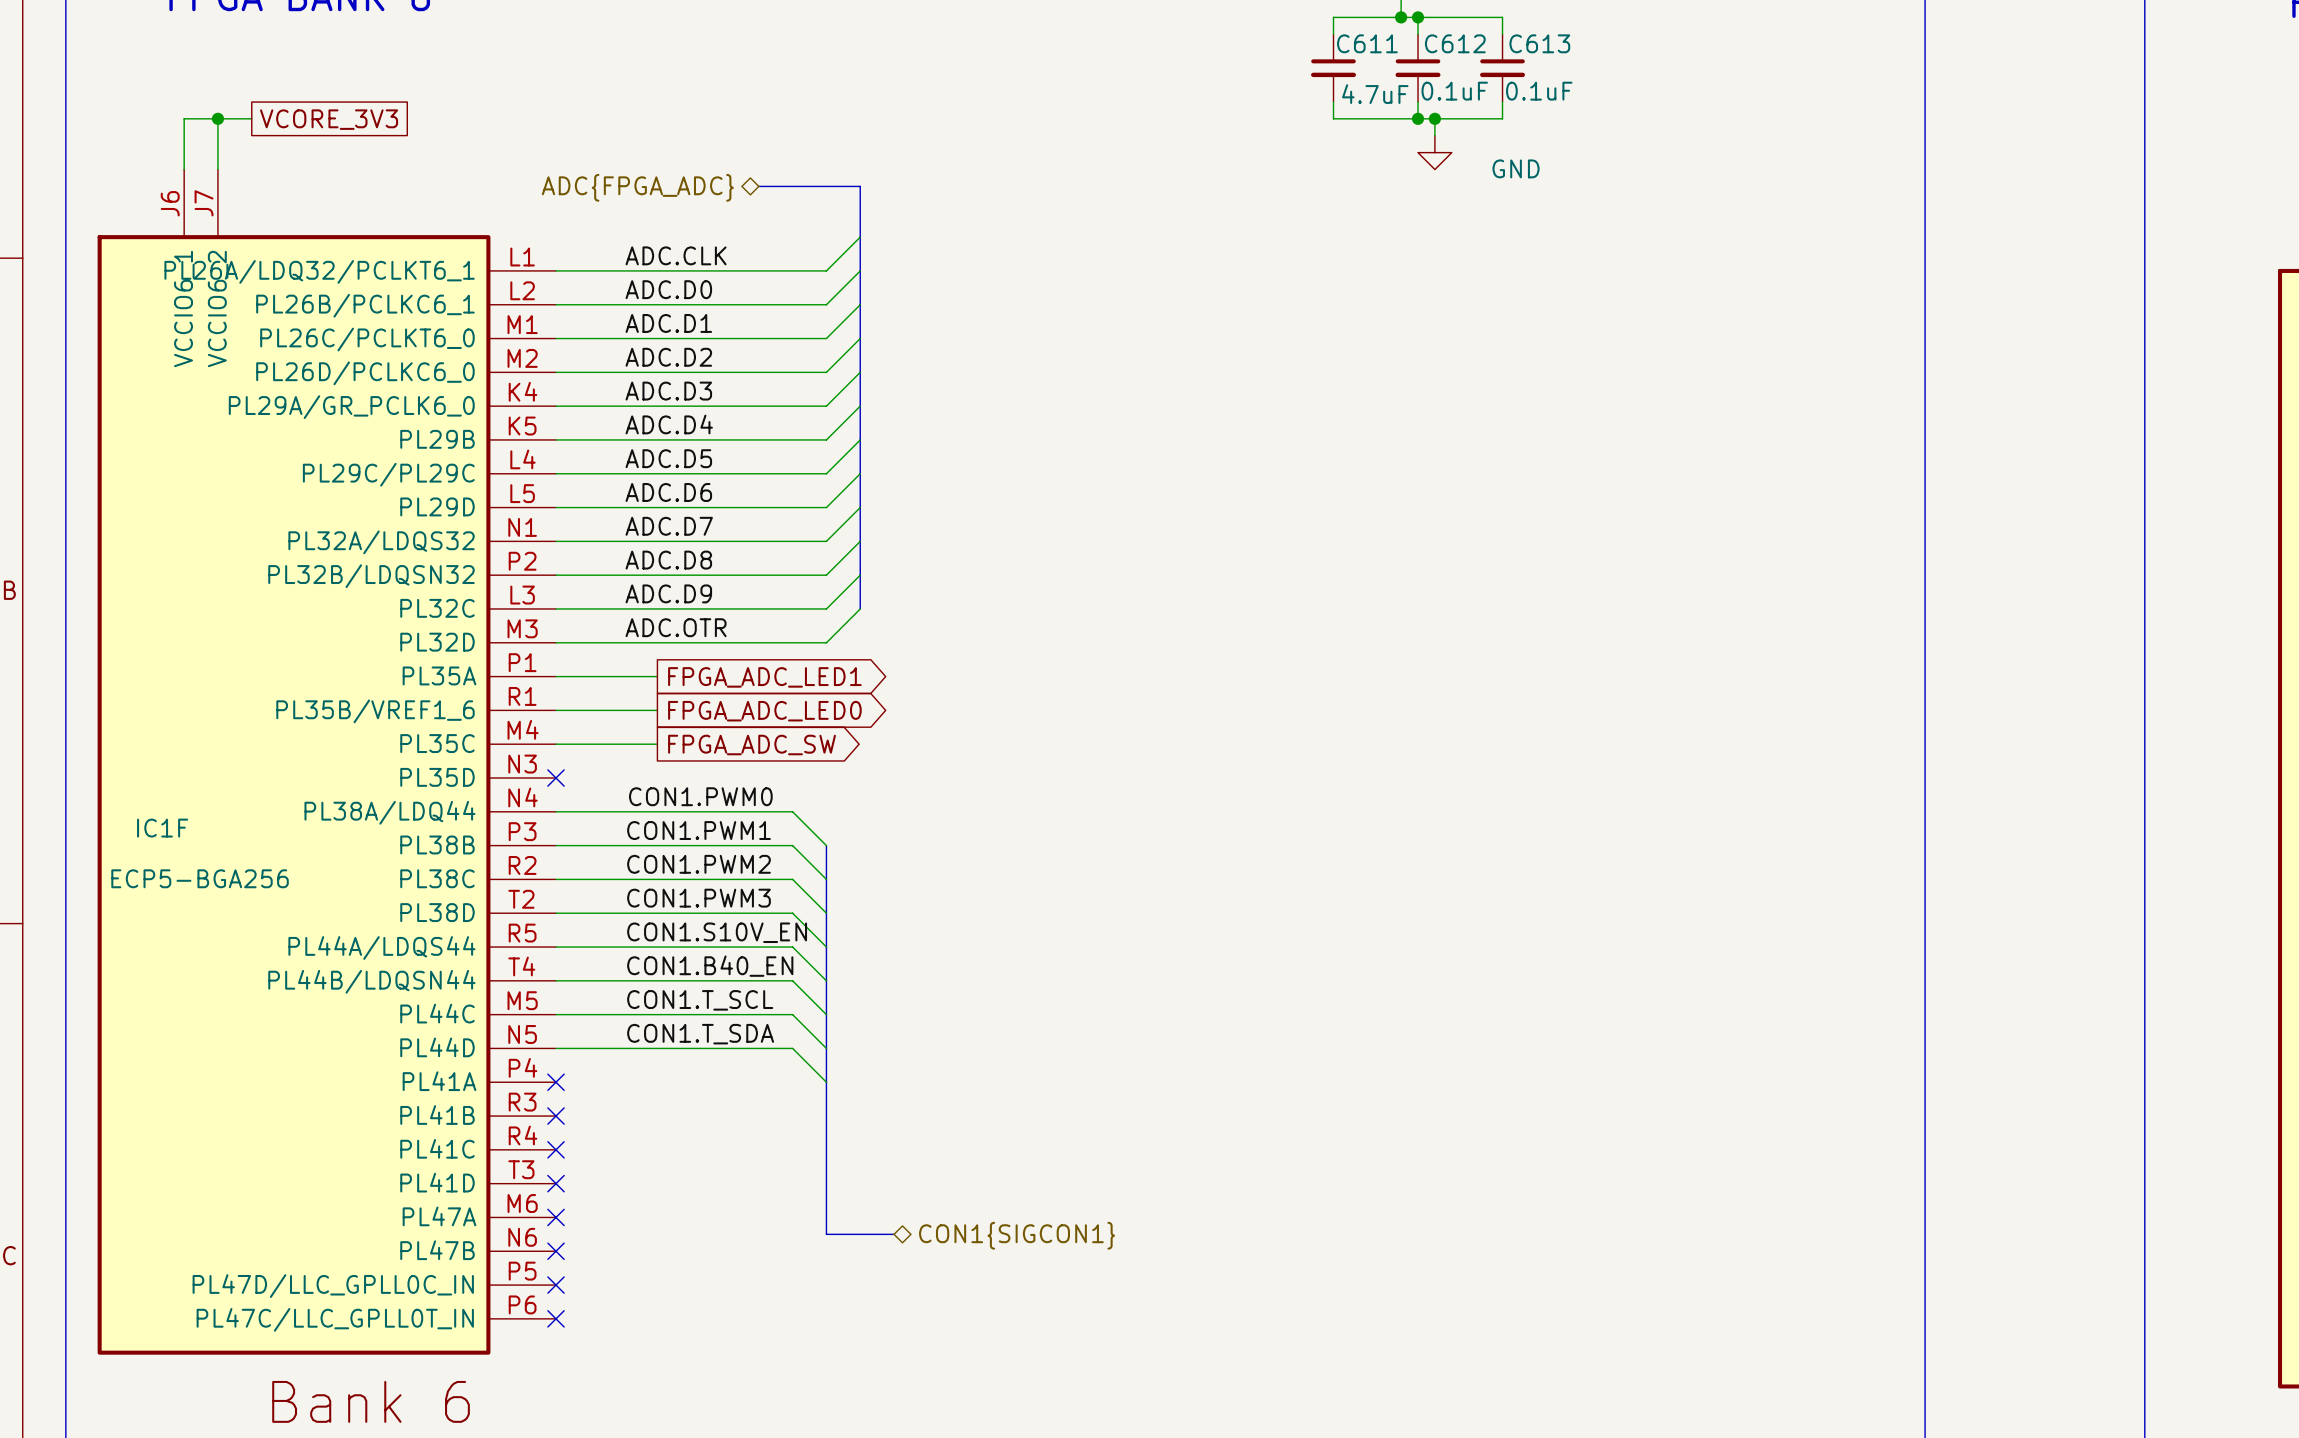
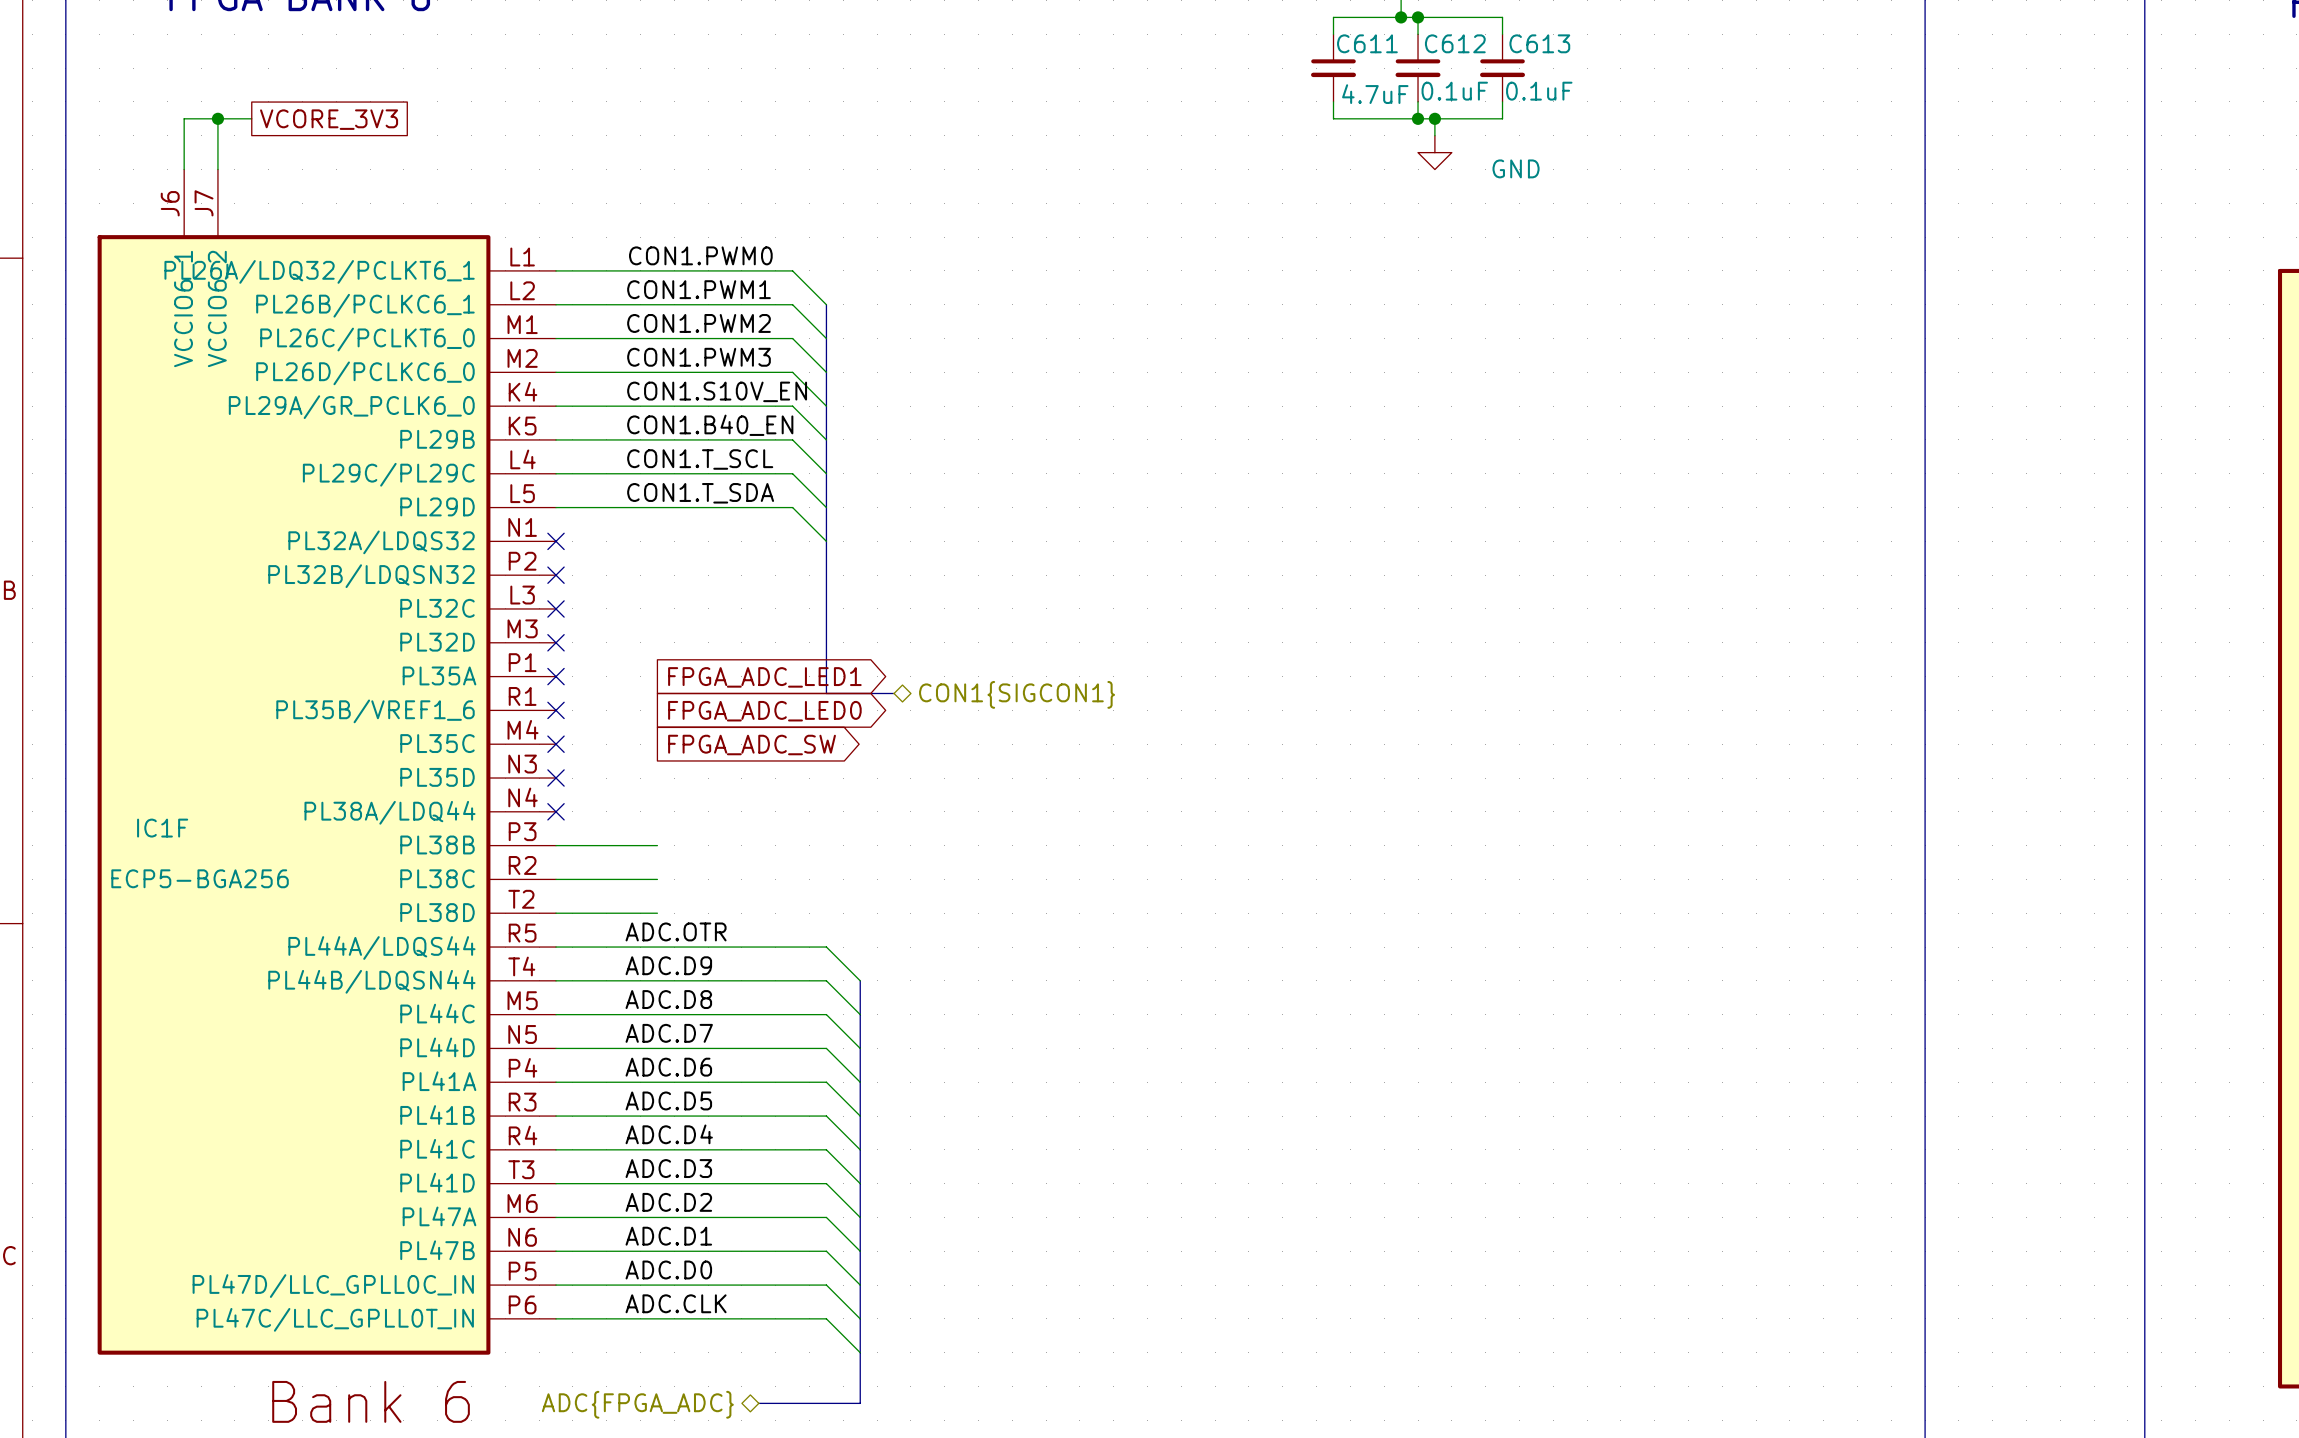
bus: (758, 186) (860, 186) (860, 608) -> none
hierarchical label: ADC{FPGA_ADC} (637, 187) -> none
wire: (860, 237) (826, 270) (792, 270) -> (826, 304) (792, 270)
label: ADC.CLK (676, 255) -> CON1.PWM0 (700, 255)
wire: (860, 270) (826, 304) (792, 304) -> (826, 338) (792, 304)
label: ADC.D0 (668, 289) -> CON1.PWM1 (698, 289)
bus: none -> (826, 304) (826, 693) (894, 693)
wire: (860, 304) (826, 338) (792, 338) -> (826, 372) (792, 338)
label: ADC.D1 (668, 323) -> CON1.PWM2 (698, 323)
wire: (860, 338) (826, 372) (792, 372) -> (826, 406) (792, 372)
label: ADC.D2 (668, 357) -> CON1.PWM3 (698, 357)
wire: (860, 372) (826, 406) (792, 406) -> (826, 439) (792, 406)
label: ADC.D3 (668, 391) -> CON1.S10V_EN (717, 391)
wire: (860, 406) (826, 439) (792, 439) -> (826, 473) (792, 439)
label: ADC.D4 (669, 424) -> CON1.B40_EN (710, 425)
wire: (860, 439) (826, 473) (792, 473) -> (826, 507) (792, 473)
label: ADC.D5 (668, 458) -> CON1.T_SCL (700, 459)
wire: (860, 473) (826, 507) (792, 507) -> (826, 541) (792, 507)
label: ADC.D6 (668, 492) -> CON1.T_SDA (700, 493)
wire: (860, 507) (826, 541) (556, 541) -> none
label: ADC.D7 (669, 526) -> none
no-connect mark: none -> (556, 541)
wire: (860, 541) (826, 575) (556, 575) -> none
label: ADC.D8 (668, 560) -> none
no-connect mark: none -> (556, 575)
wire: (860, 575) (826, 608) (556, 608) -> none
label: ADC.D9 (668, 593) -> none
no-connect mark: none -> (556, 608)
wire: (860, 608) (826, 642) (556, 642) -> none
label: ADC.OTR (676, 627) -> none
no-connect mark: none -> (556, 642)
wire: (556, 676) (657, 676) -> none
no-connect mark: none -> (556, 676)
hierarchical label: none -> CON1{SIGCON1} (1017, 694)
wire: (556, 710) (657, 710) -> none
no-connect mark: none -> (556, 710)
wire: (556, 744) (657, 744) -> none
no-connect mark: none -> (556, 744)
label: CON1.PWM0 (700, 796) -> none
wire: (556, 811) (792, 811) (826, 845) -> none
no-connect mark: none -> (556, 811)
label: CON1.PWM1 (698, 830) -> none
wire: (657, 845) (792, 845) (826, 879) -> none
bus: (826, 845) (826, 1234) (894, 1234) -> none
label: CON1.PWM2 (698, 864) -> none
wire: (657, 879) (792, 879) (826, 913) -> none
label: CON1.PWM3 (698, 898) -> none
wire: (657, 913) (792, 913) (826, 947) -> none
label: CON1.S10V_EN (717, 932) -> ADC.OTR (676, 931)
wire: (792, 947) (826, 980) -> (792, 947) (826, 947) (860, 980)
label: CON1.B40_EN (710, 966) -> ADC.D9 (668, 965)
wire: (792, 980) (826, 1014) -> (792, 980) (826, 980) (860, 1014)
bus: none -> (860, 980) (860, 1403) (758, 1403)
label: CON1.T_SCL (700, 1000) -> ADC.D8 (668, 999)
wire: (792, 1014) (826, 1048) -> (792, 1014) (826, 1014) (860, 1048)
label: CON1.T_SDA (700, 1034) -> ADC.D7 (669, 1033)
wire: (792, 1048) (826, 1082) -> (792, 1048) (826, 1048) (860, 1082)
label: none -> ADC.D6 (668, 1067)
wire: none -> (556, 1082) (826, 1082) (860, 1116)
no-connect mark: (556, 1082) -> none
label: none -> ADC.D5 (668, 1100)
wire: none -> (556, 1116) (826, 1116) (860, 1149)
no-connect mark: (556, 1116) -> none
label: none -> ADC.D4 (669, 1134)
wire: none -> (556, 1149) (826, 1149) (860, 1183)
no-connect mark: (556, 1149) -> none
label: none -> ADC.D3 (668, 1168)
wire: none -> (556, 1183) (826, 1183) (860, 1217)
no-connect mark: (556, 1183) -> none
label: none -> ADC.D2 (668, 1202)
wire: none -> (556, 1217) (826, 1217) (860, 1251)
no-connect mark: (556, 1217) -> none
hierarchical label: CON1{SIGCON1} (1017, 1235) -> none
label: none -> ADC.D1 (668, 1236)
wire: none -> (556, 1251) (826, 1251) (860, 1285)
no-connect mark: (556, 1251) -> none
label: none -> ADC.D0 (668, 1269)
wire: none -> (556, 1285) (826, 1285) (860, 1318)
no-connect mark: (556, 1285) -> none
label: none -> ADC.CLK (676, 1303)
wire: none -> (556, 1318) (826, 1318) (860, 1352)
no-connect mark: (556, 1318) -> none
hierarchical label: none -> ADC{FPGA_ADC} (637, 1404)

